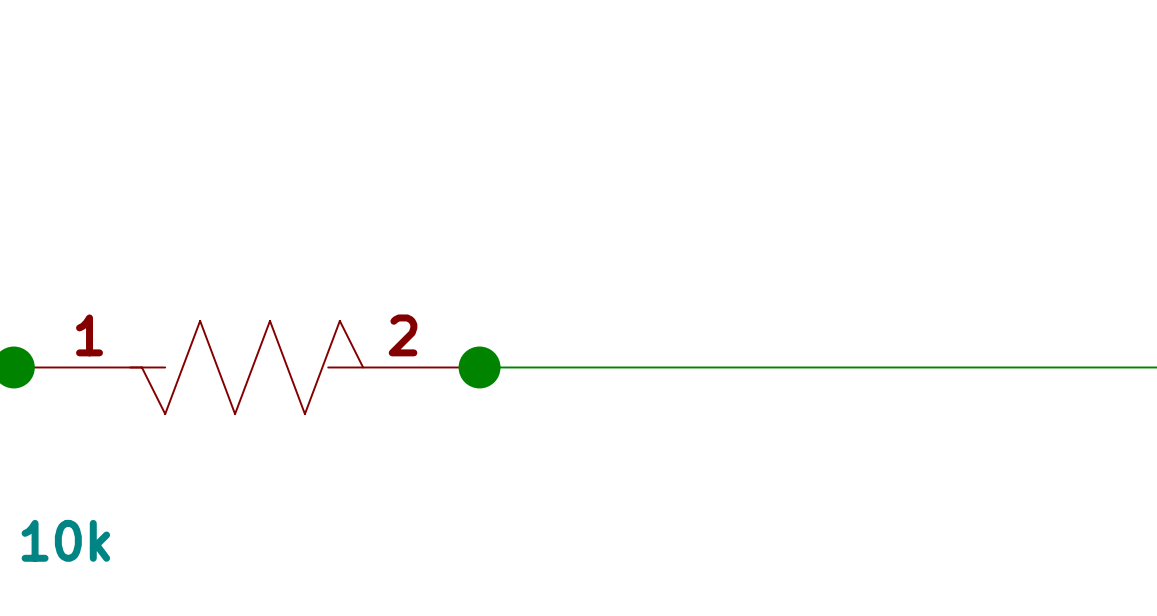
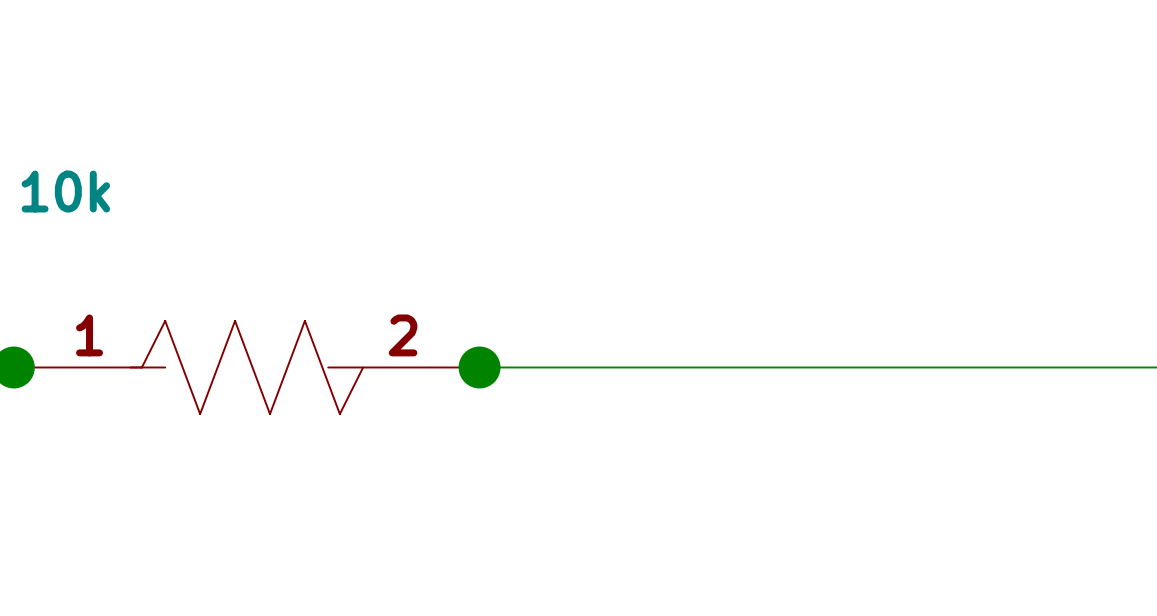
part flip: as is (246, 367) -> up-down (246, 367)

